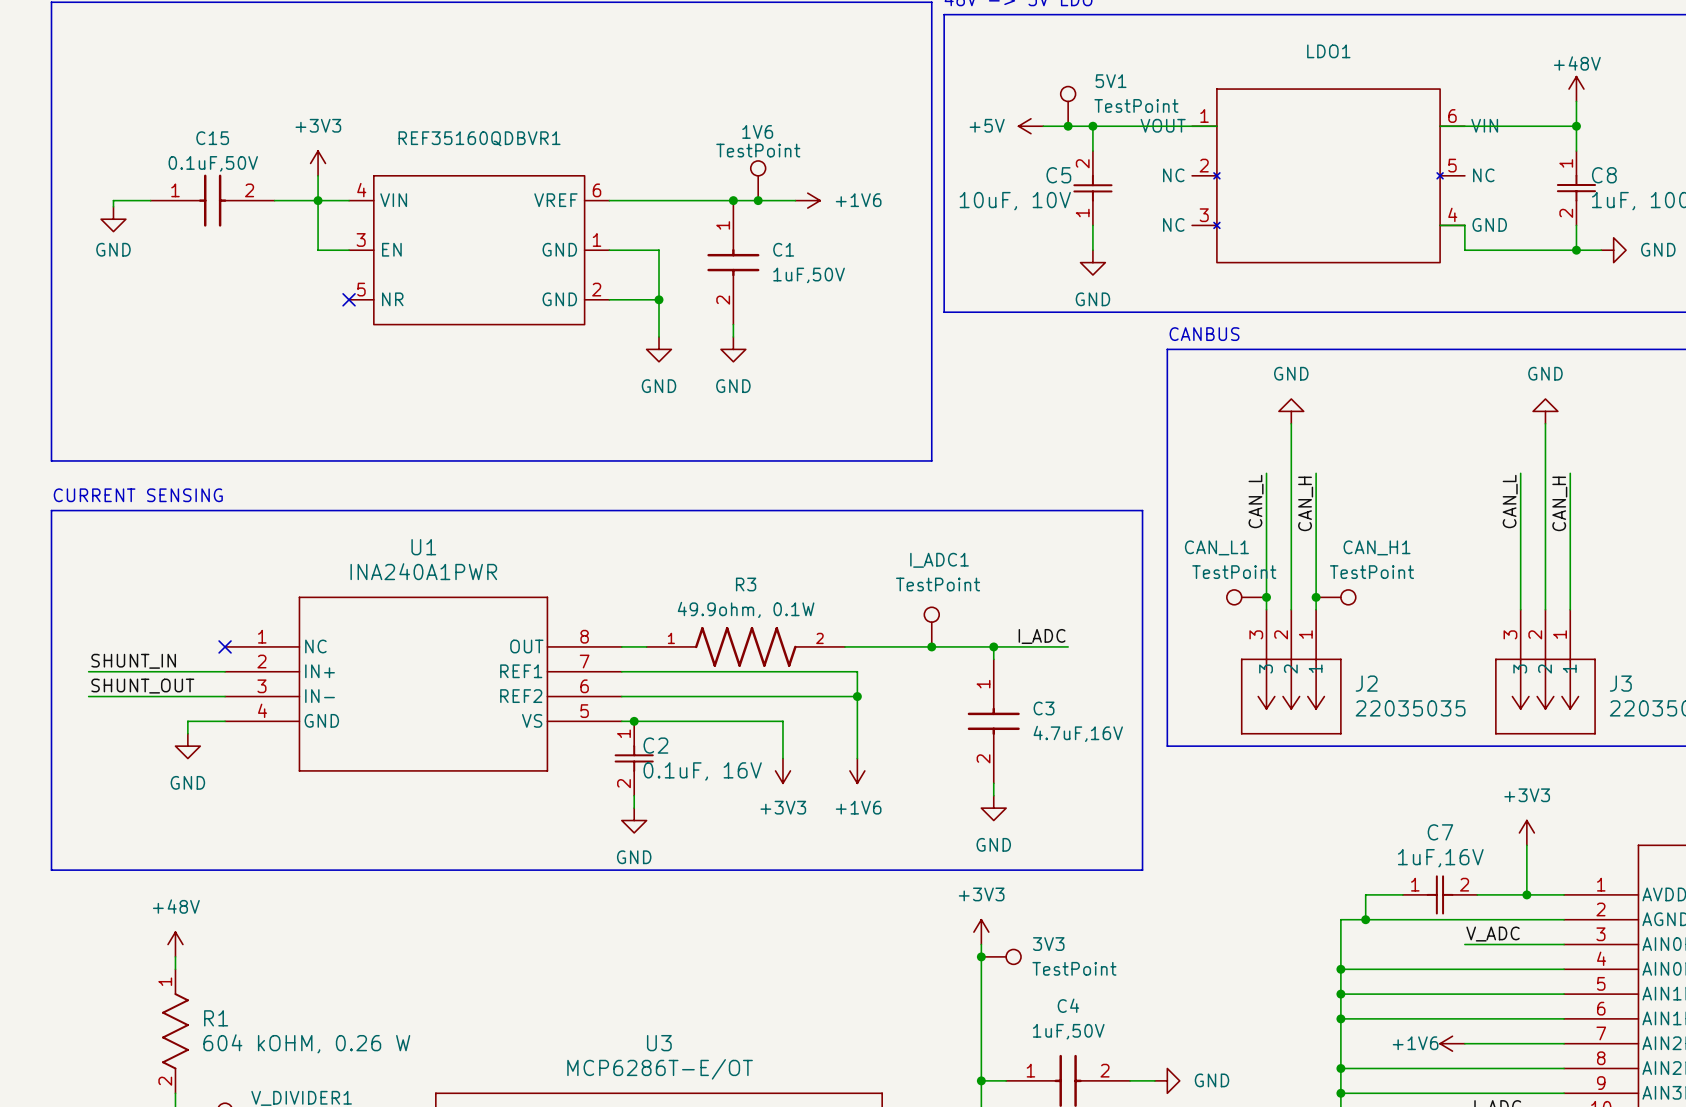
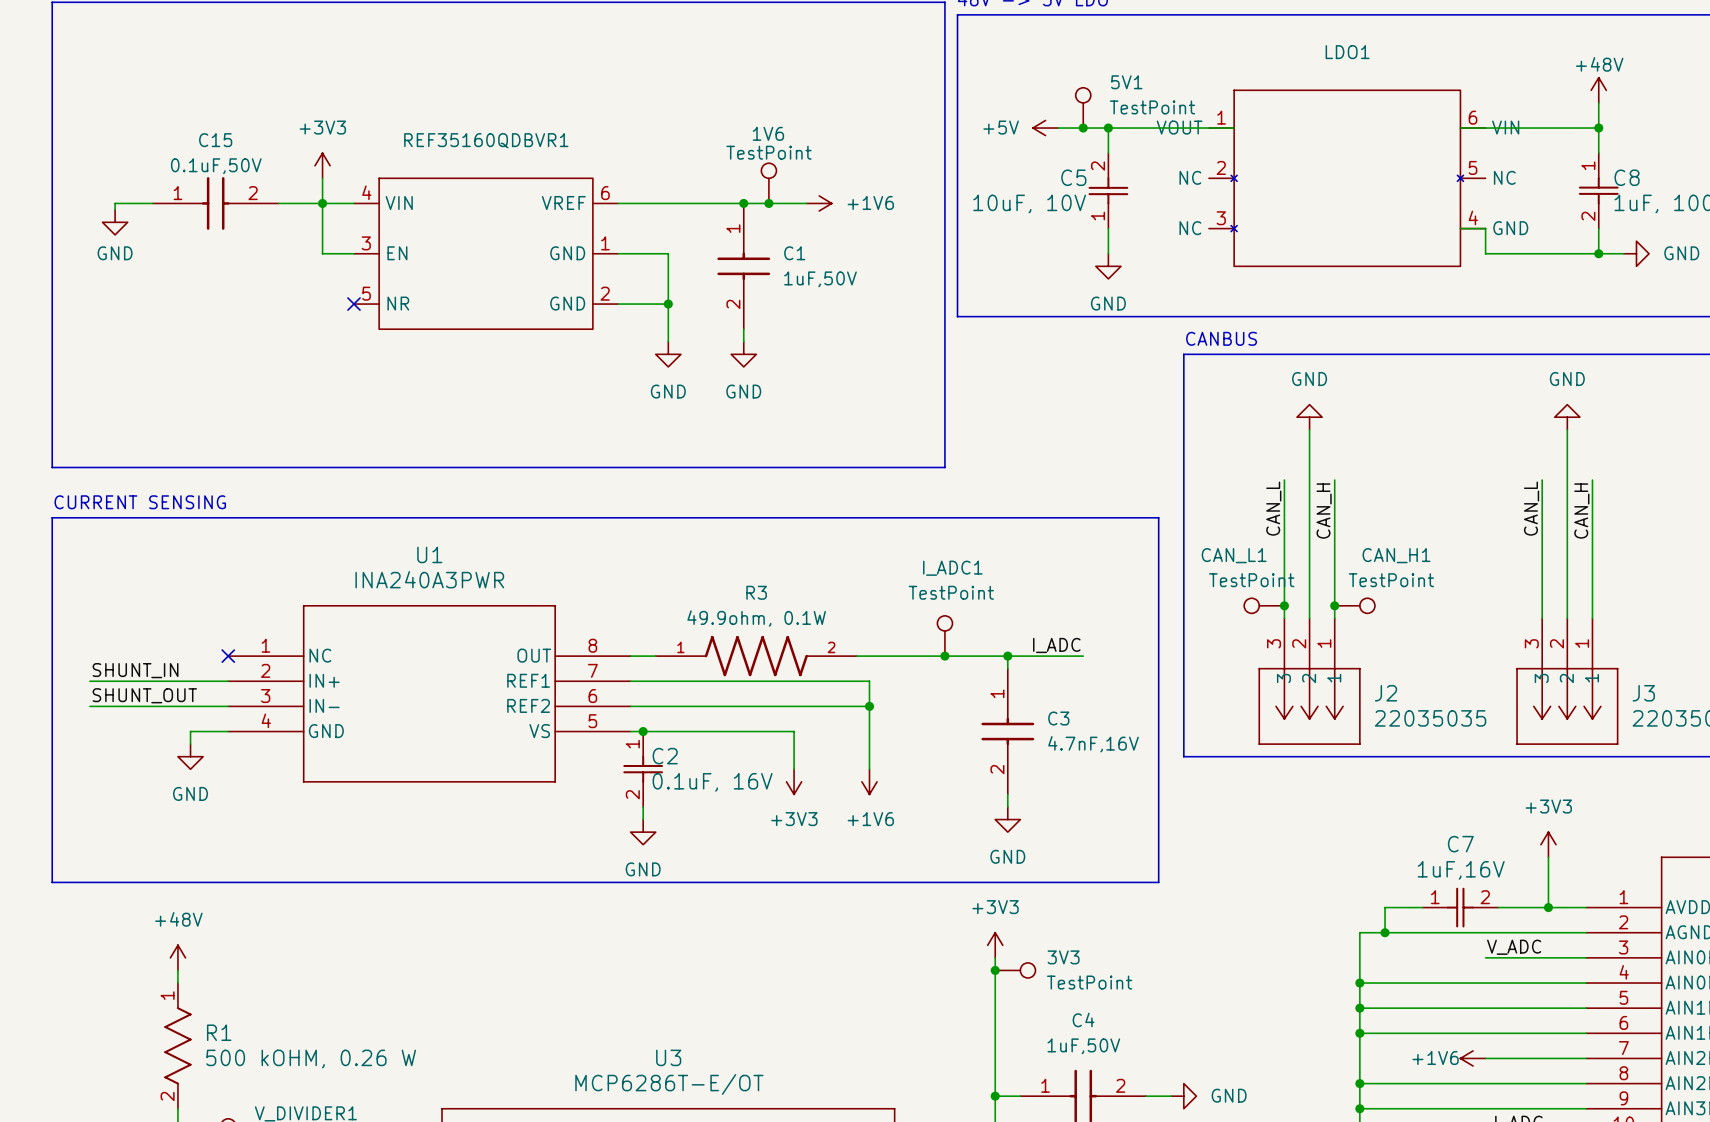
U1 value: INA240A1PWR (423, 571) -> INA240A3PWR (429, 579)
C3 value: 4.7uF,16V (1078, 733) -> 4.7nF,16V (1093, 744)
R1 value: 604 kOHM, 0.26 W (306, 1043) -> 500 kOHM, 0.26 W (311, 1058)

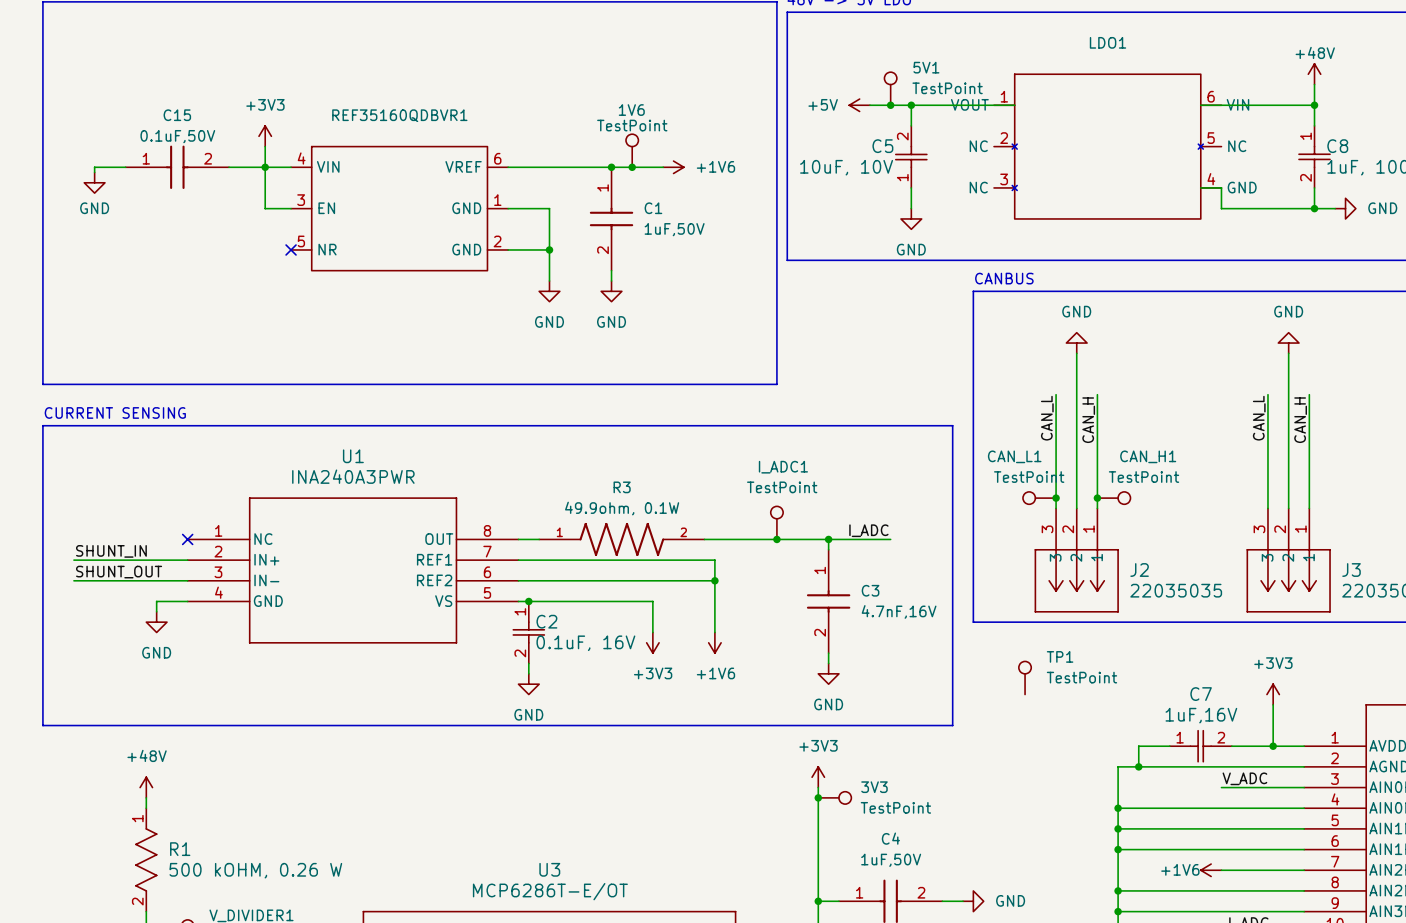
TP1: none -> TestPoint (1025, 677)

